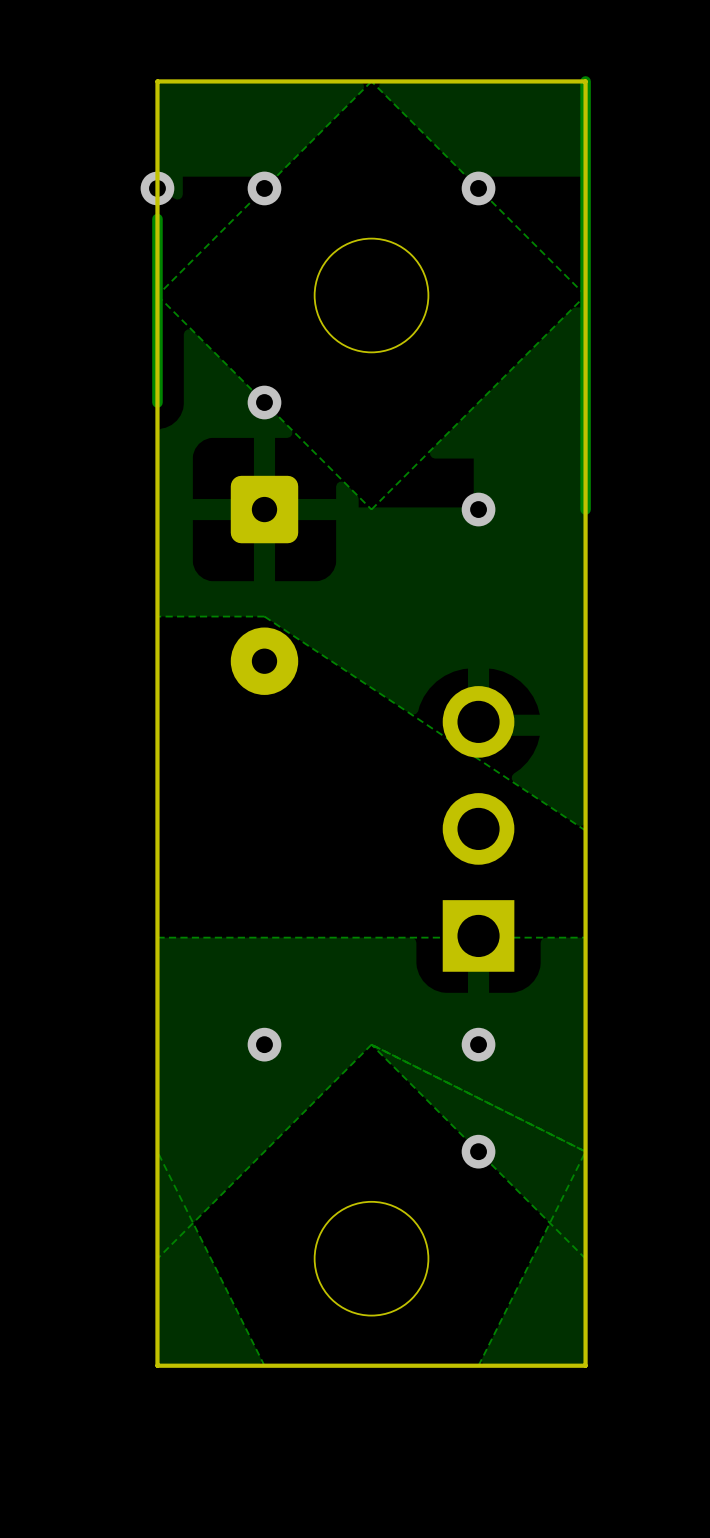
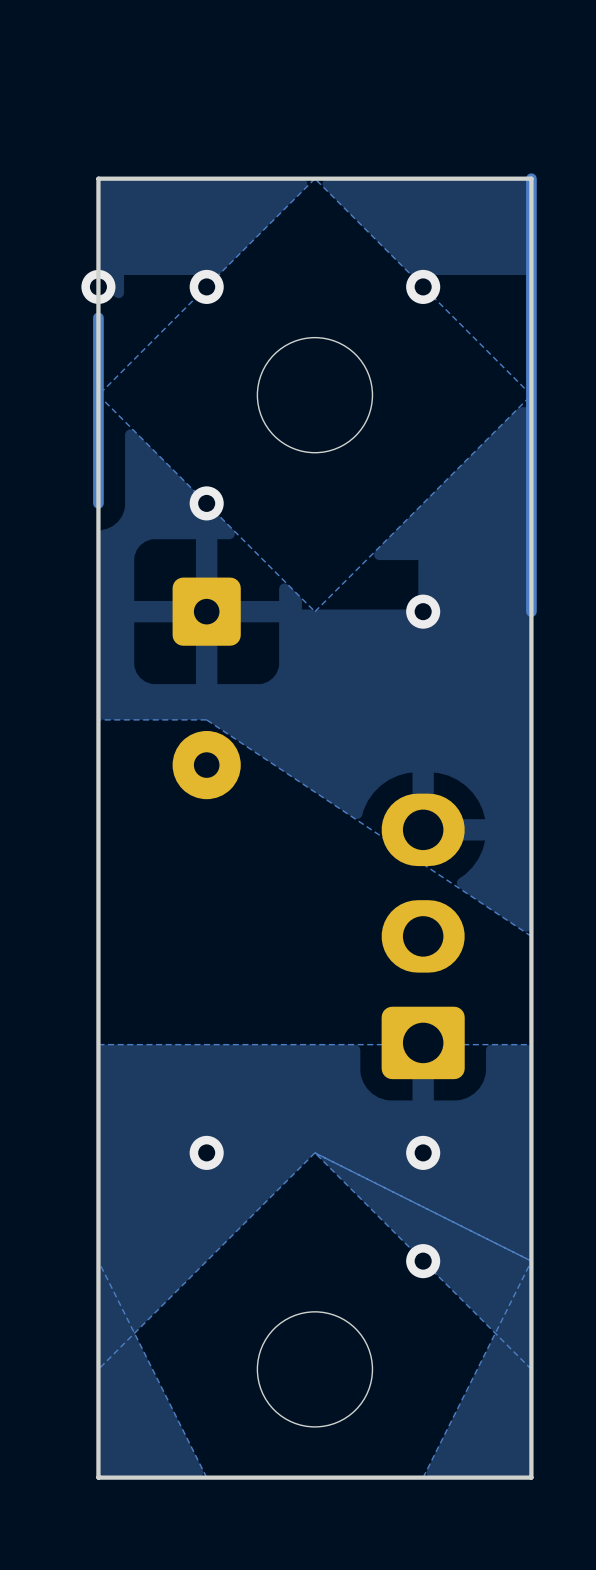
part footprint: [442, 686, 515, 972] -> [381, 793, 465, 1080]

